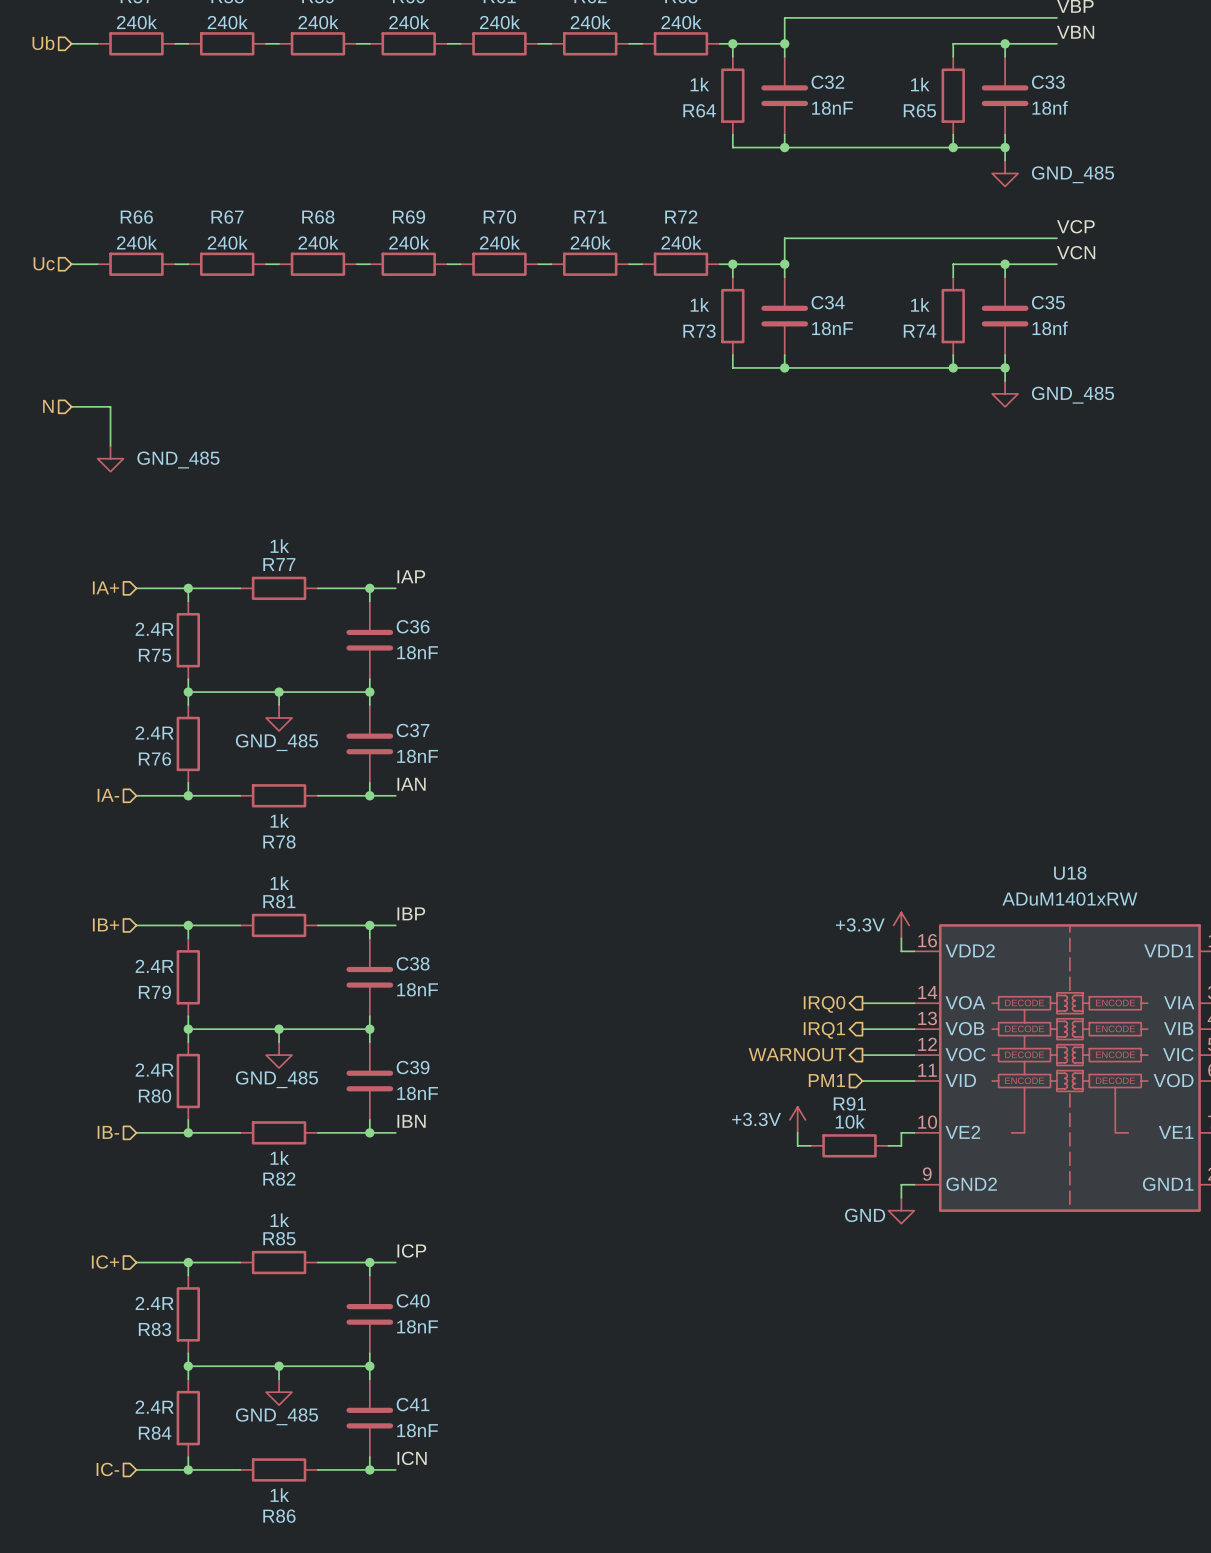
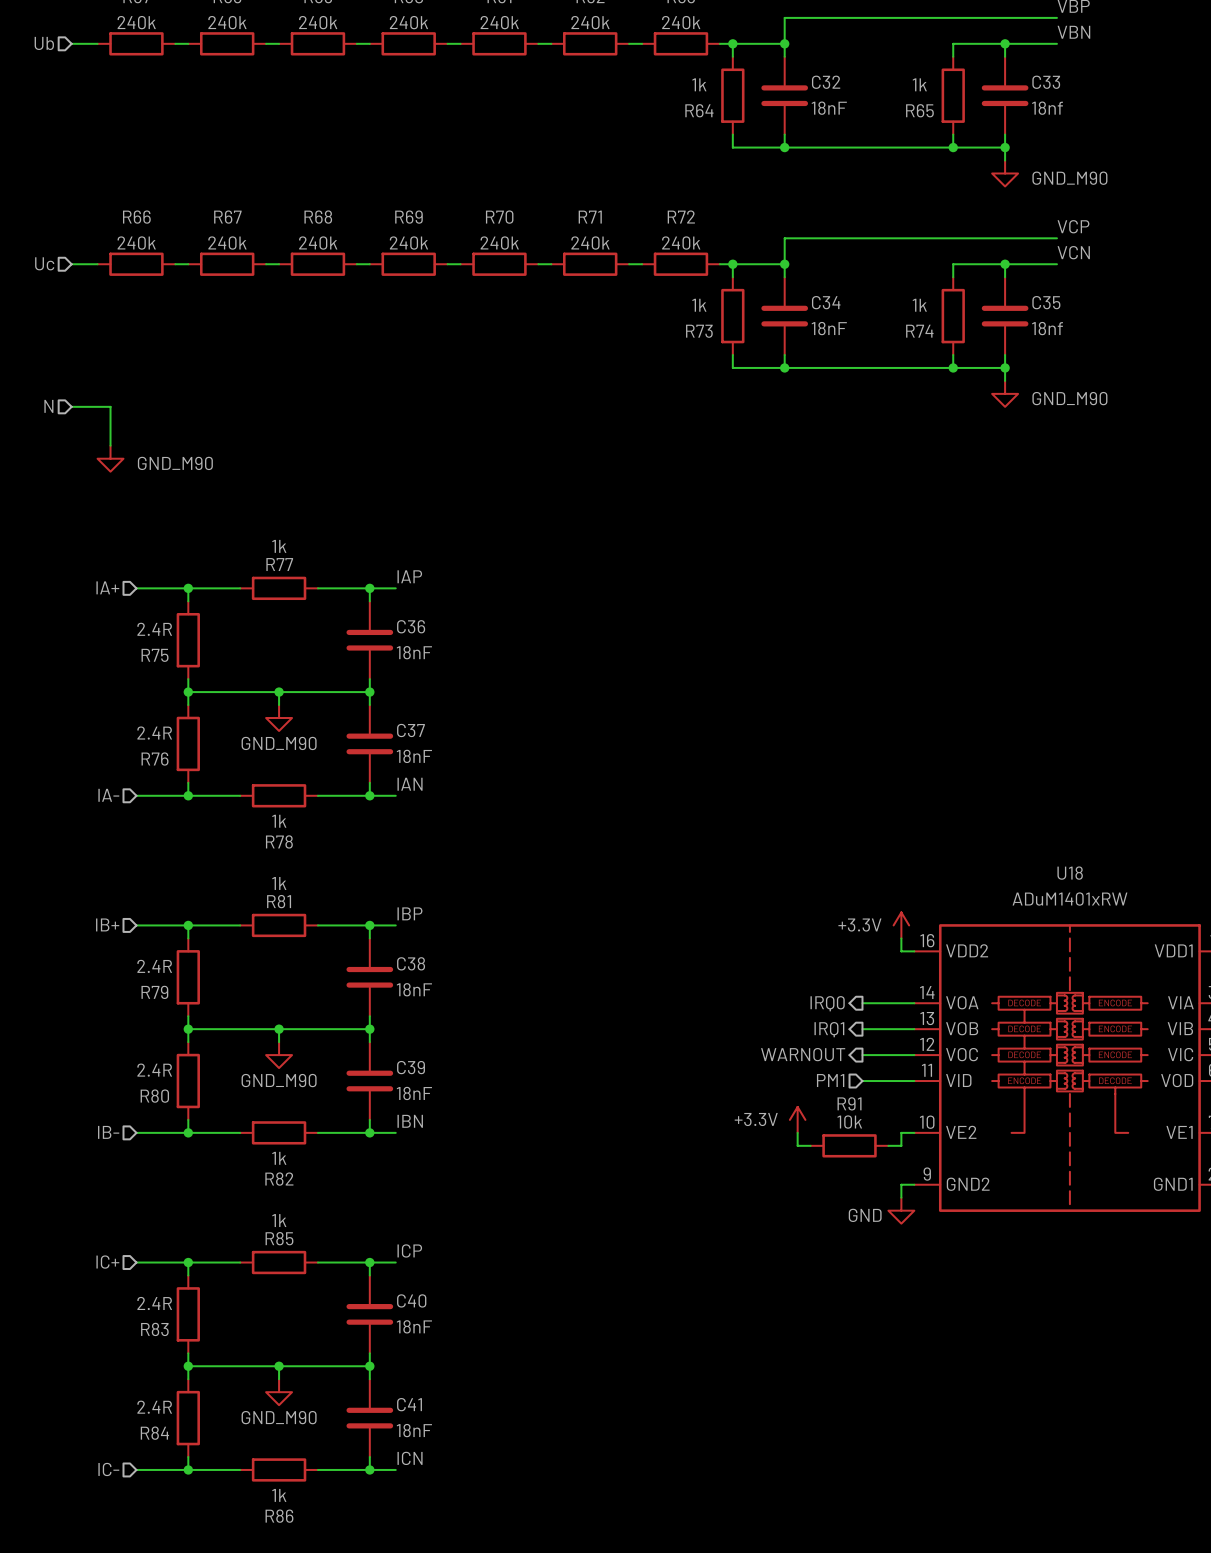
power symbol: GND_485 (1005, 173) -> GND_M90 (1005, 173)
power symbol: GND_485 (1005, 393) -> GND_M90 (1005, 393)
power symbol: GND_485 (110, 458) -> GND_M90 (110, 458)
power symbol: GND_485 (279, 718) -> GND_M90 (279, 718)
power symbol: GND_485 (279, 1055) -> GND_M90 (279, 1055)
power symbol: GND_485 (279, 1392) -> GND_M90 (279, 1392)

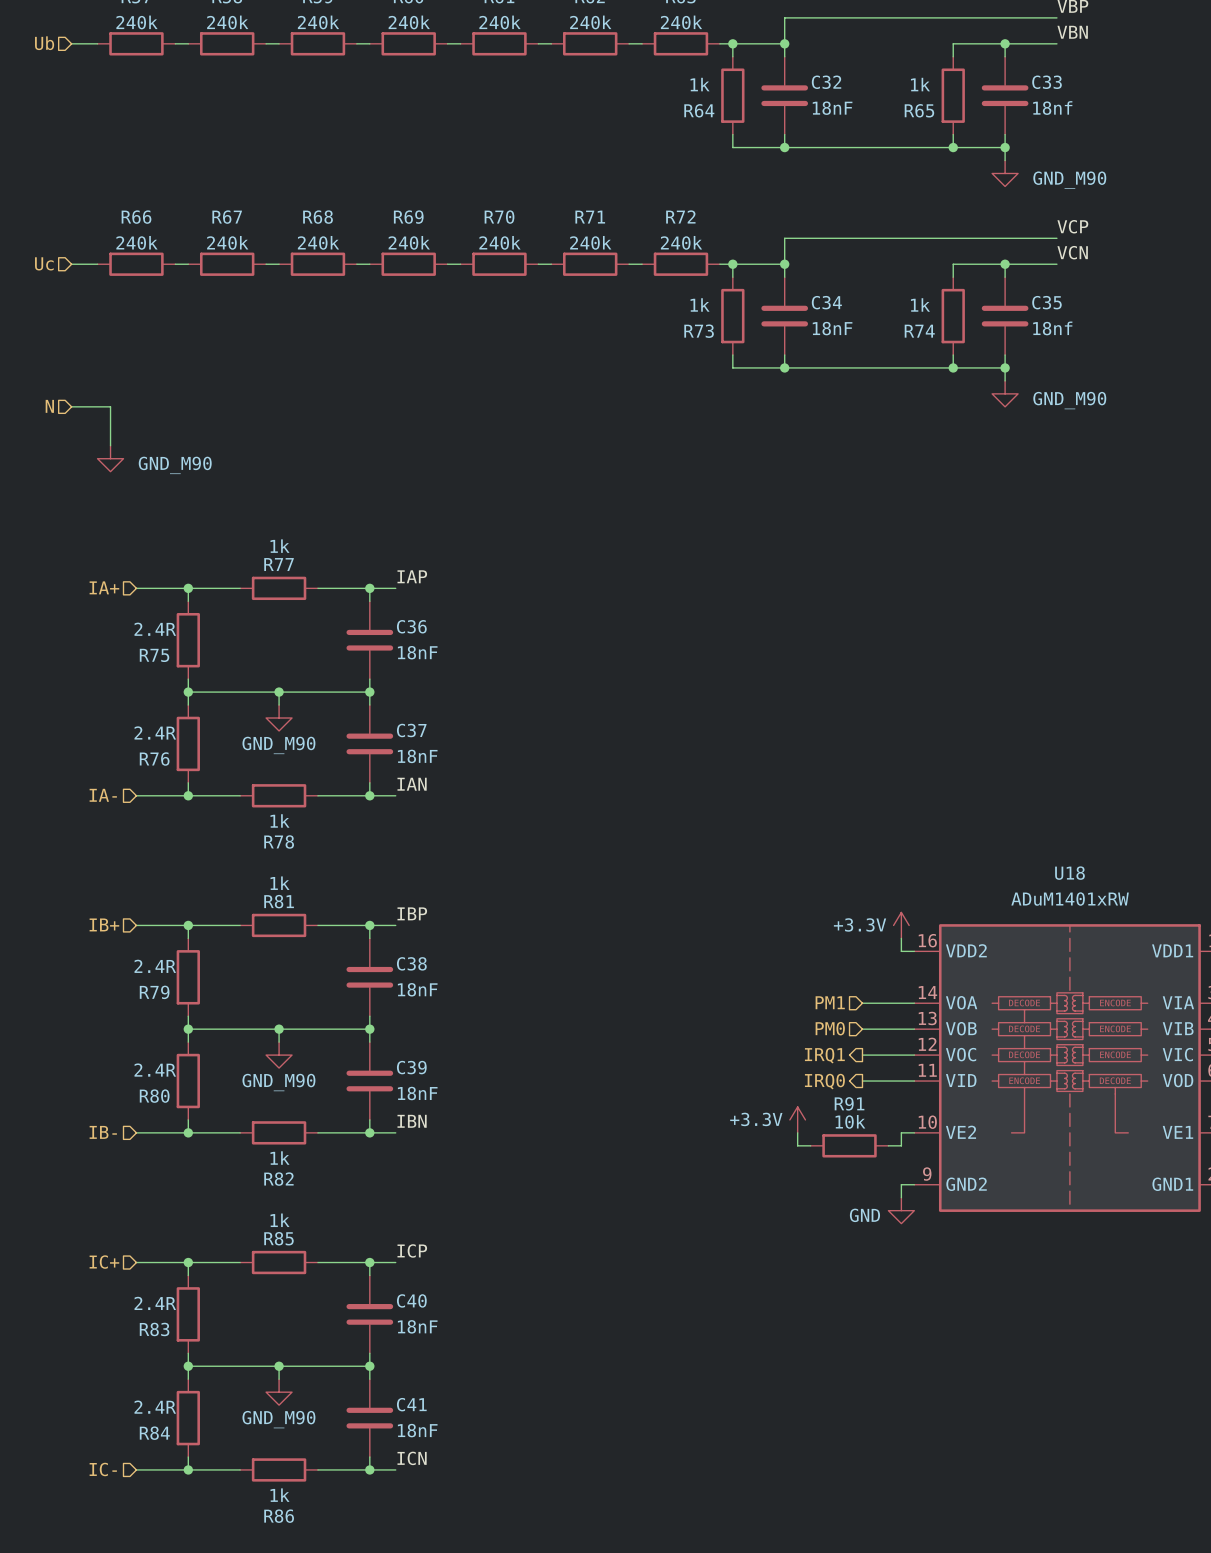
hierarchical label shape: output (827, 1003) -> input (830, 1002)
hierarchical label: IRQ0 (827, 1003) -> PM1 (830, 1002)
hierarchical label shape: output (829, 1029) -> input (830, 1028)
hierarchical label: IRQ1 (829, 1029) -> PM0 (830, 1028)
hierarchical label: WARNOUT (803, 1054) -> IRQ1 (824, 1055)
hierarchical label shape: input (830, 1080) -> output (824, 1081)
hierarchical label: PM1 (830, 1080) -> IRQ0 (824, 1081)

